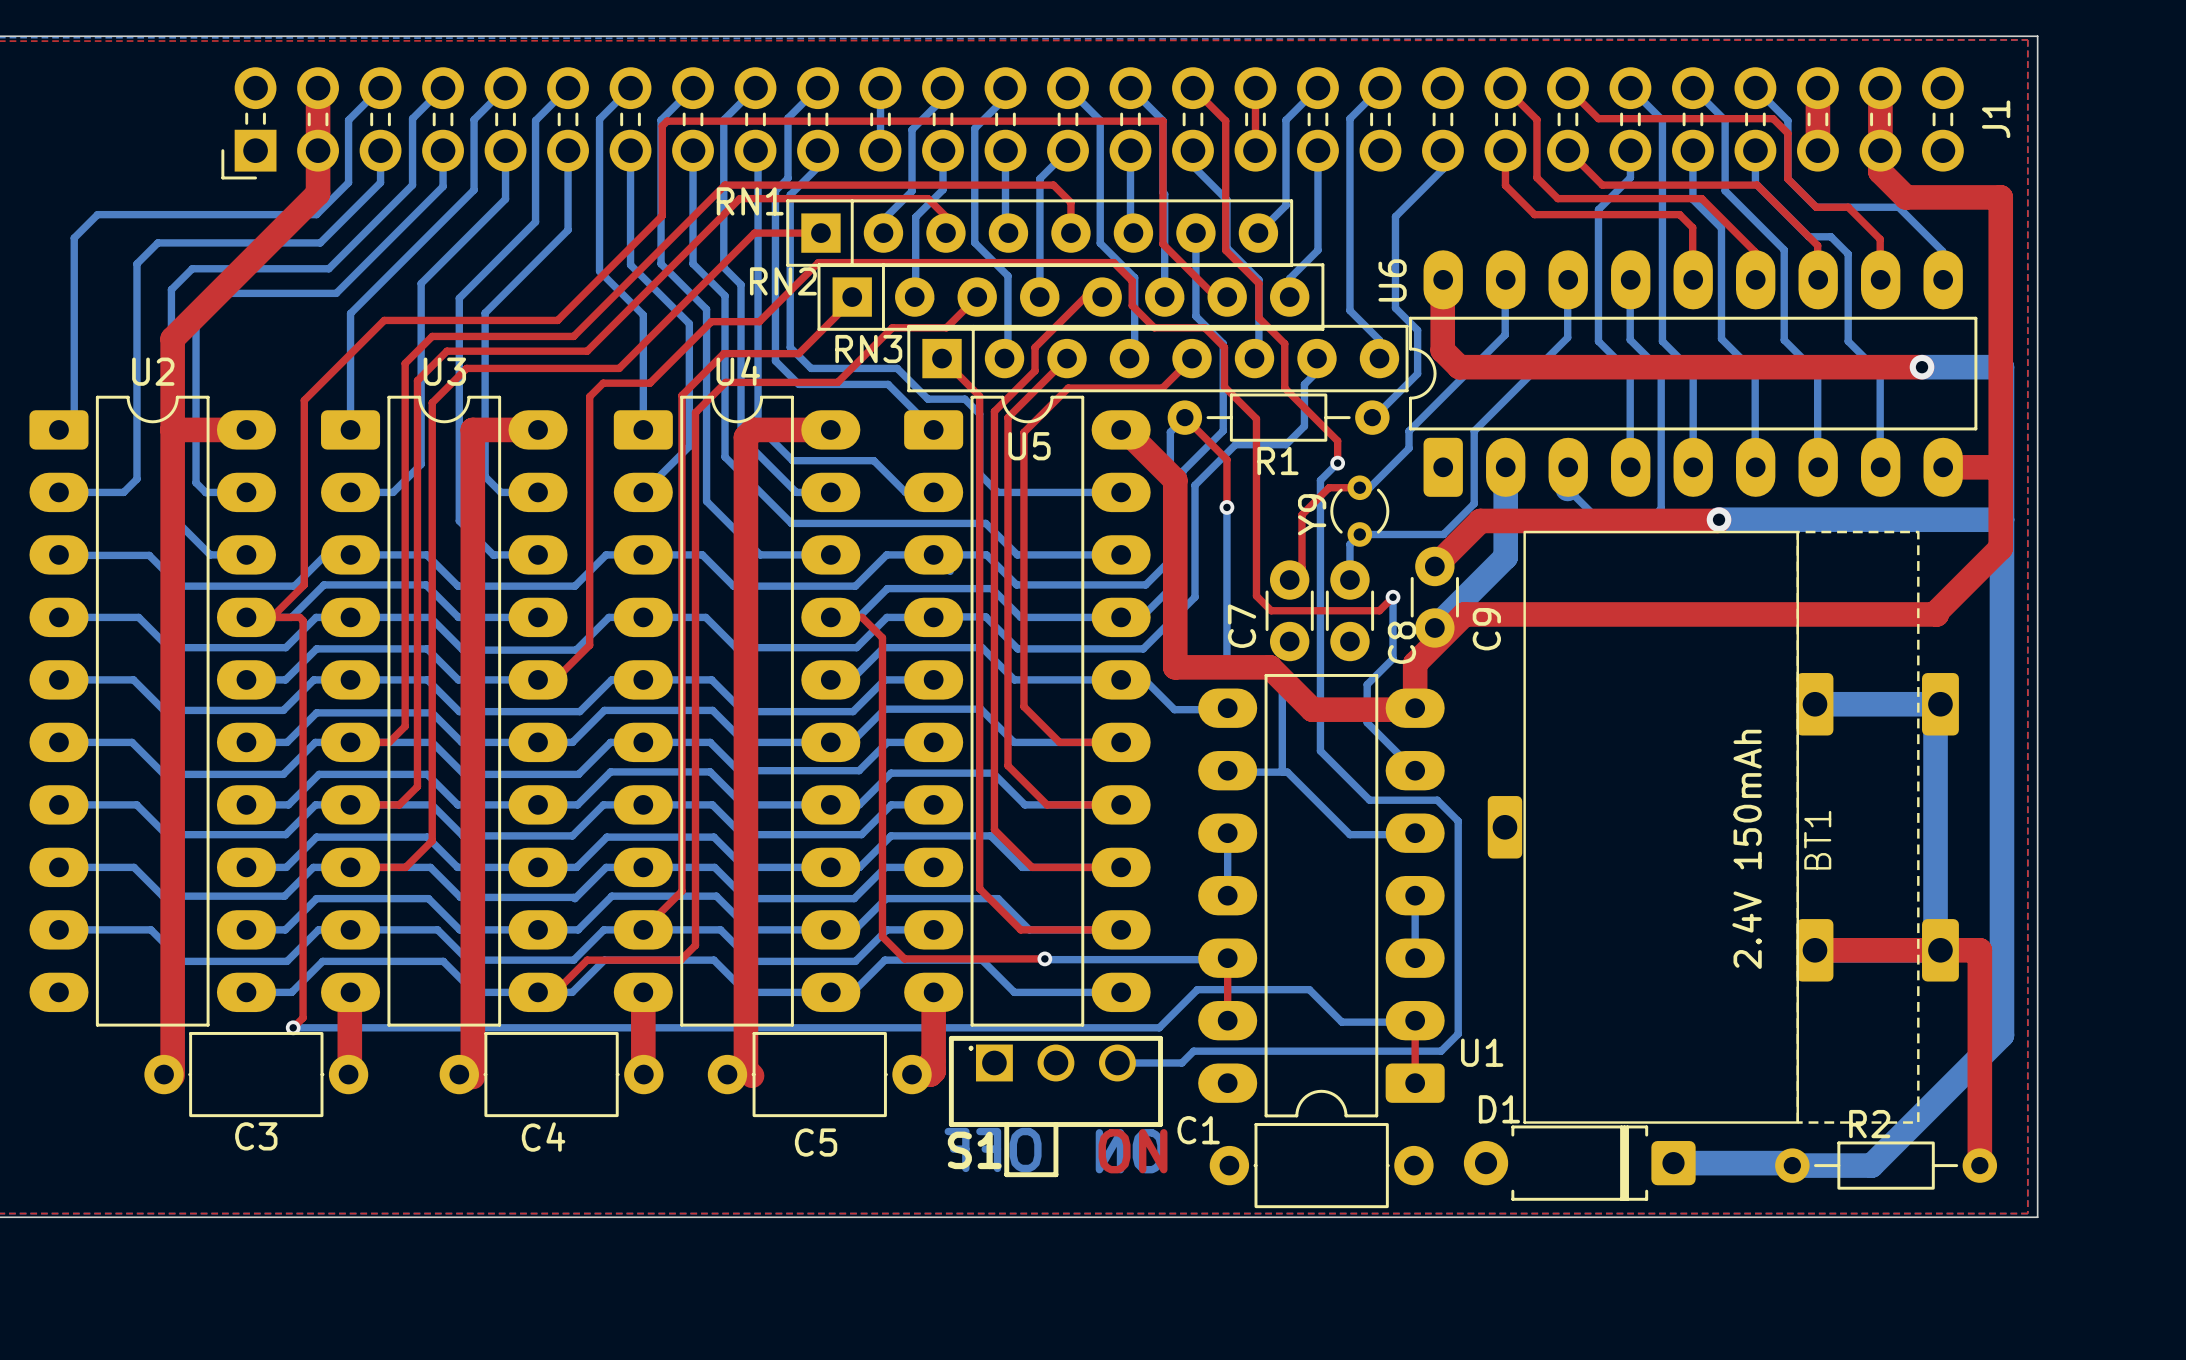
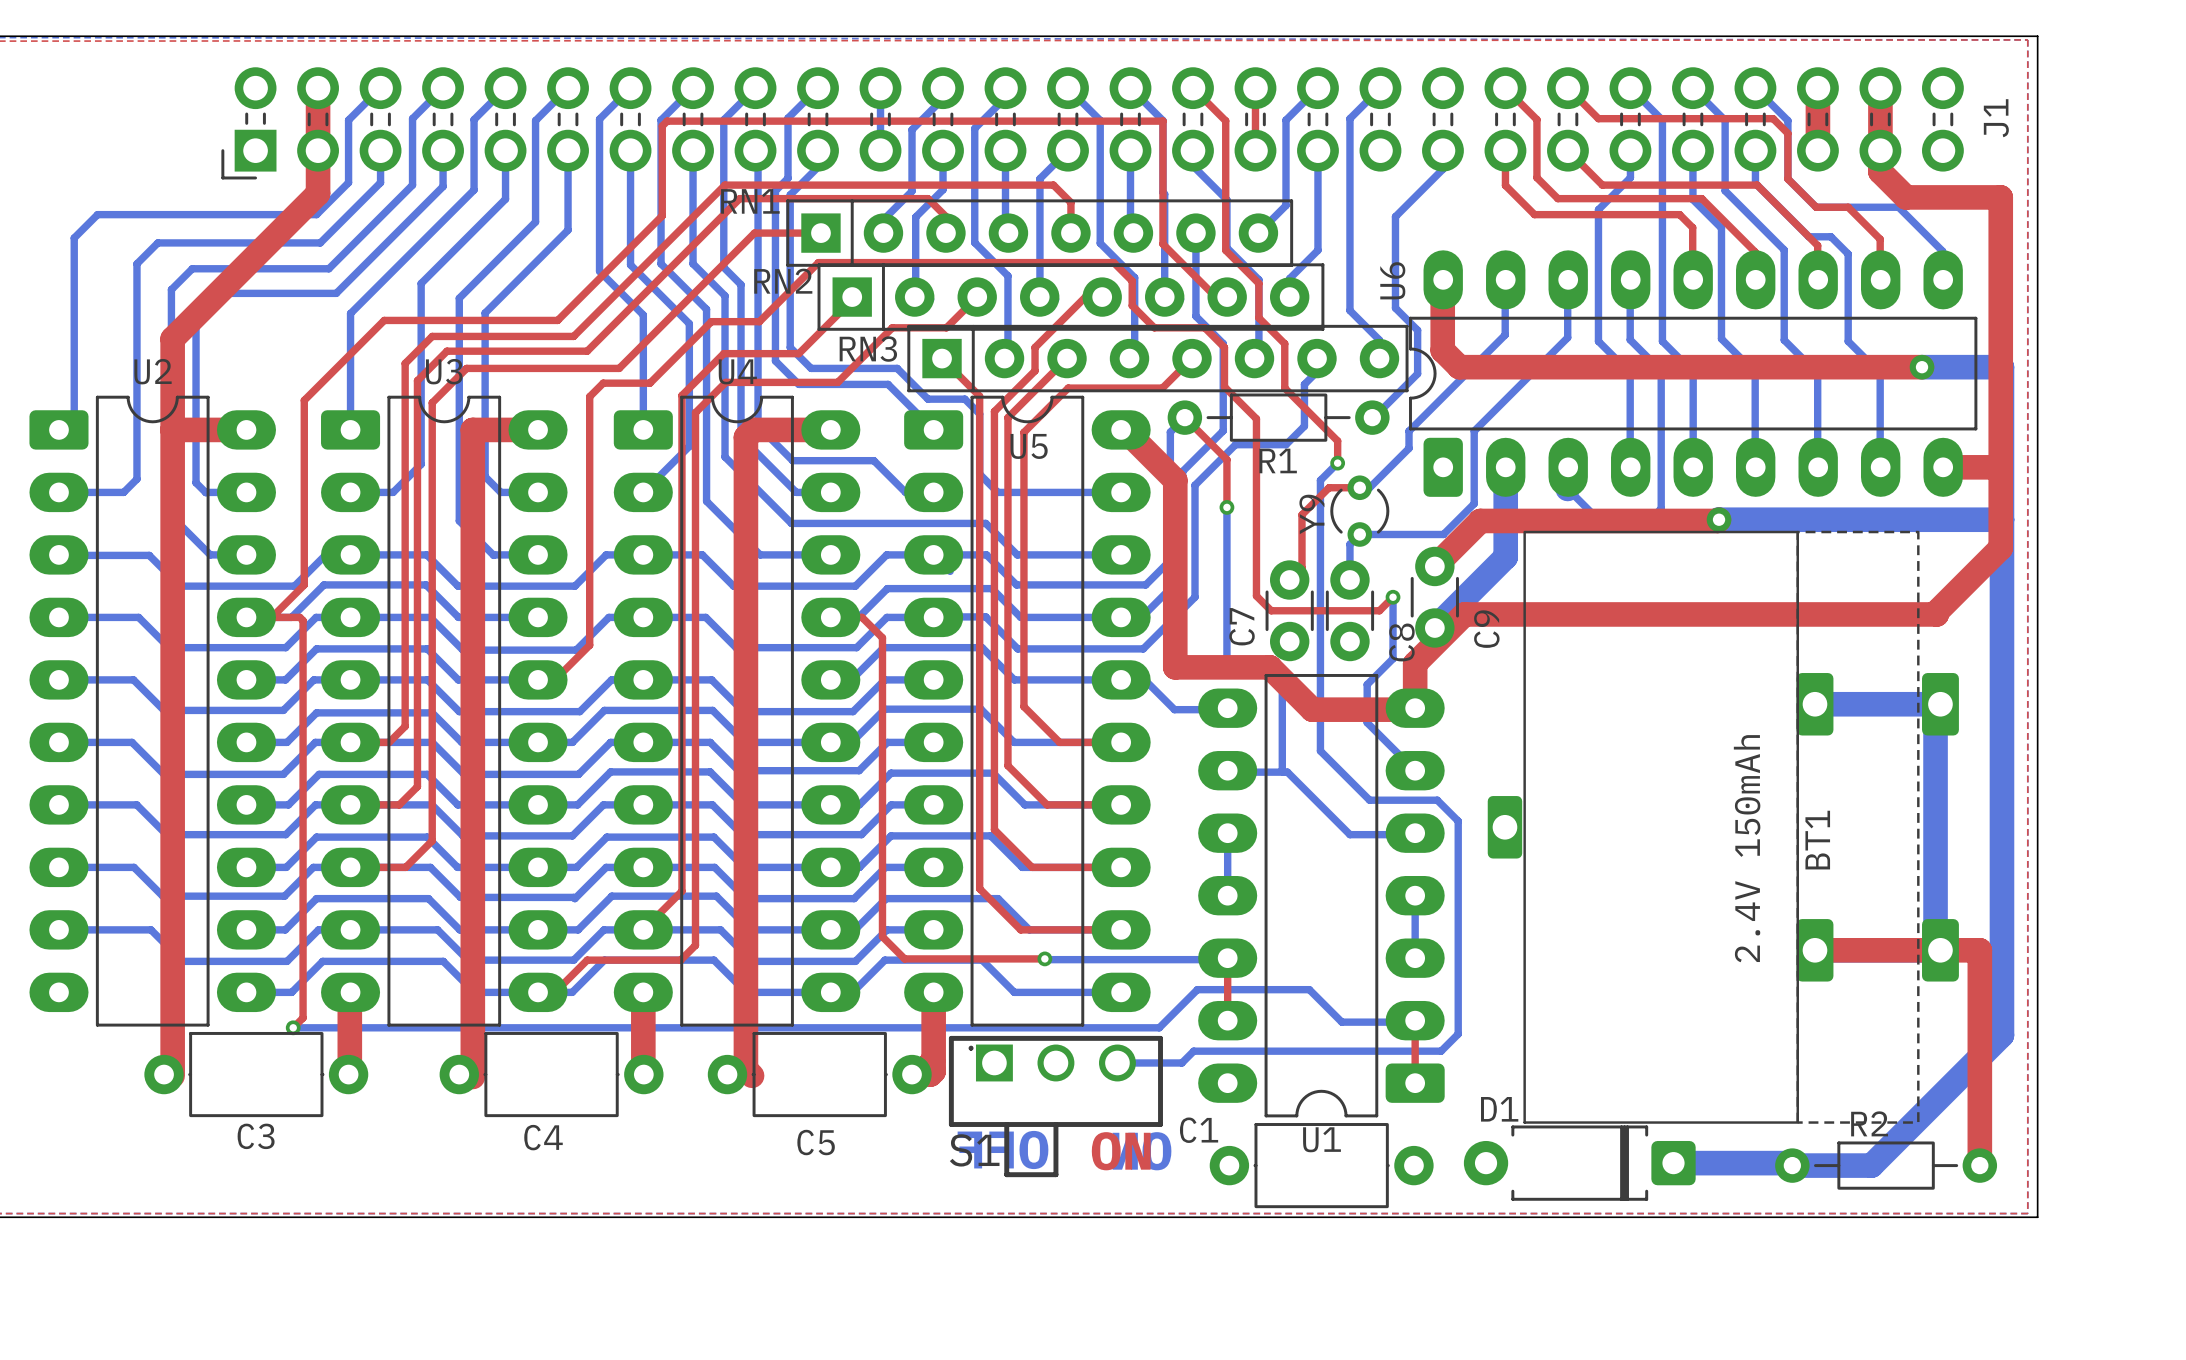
U1 name position: U1 (1482, 1052) -> U1 (1322, 1139)

